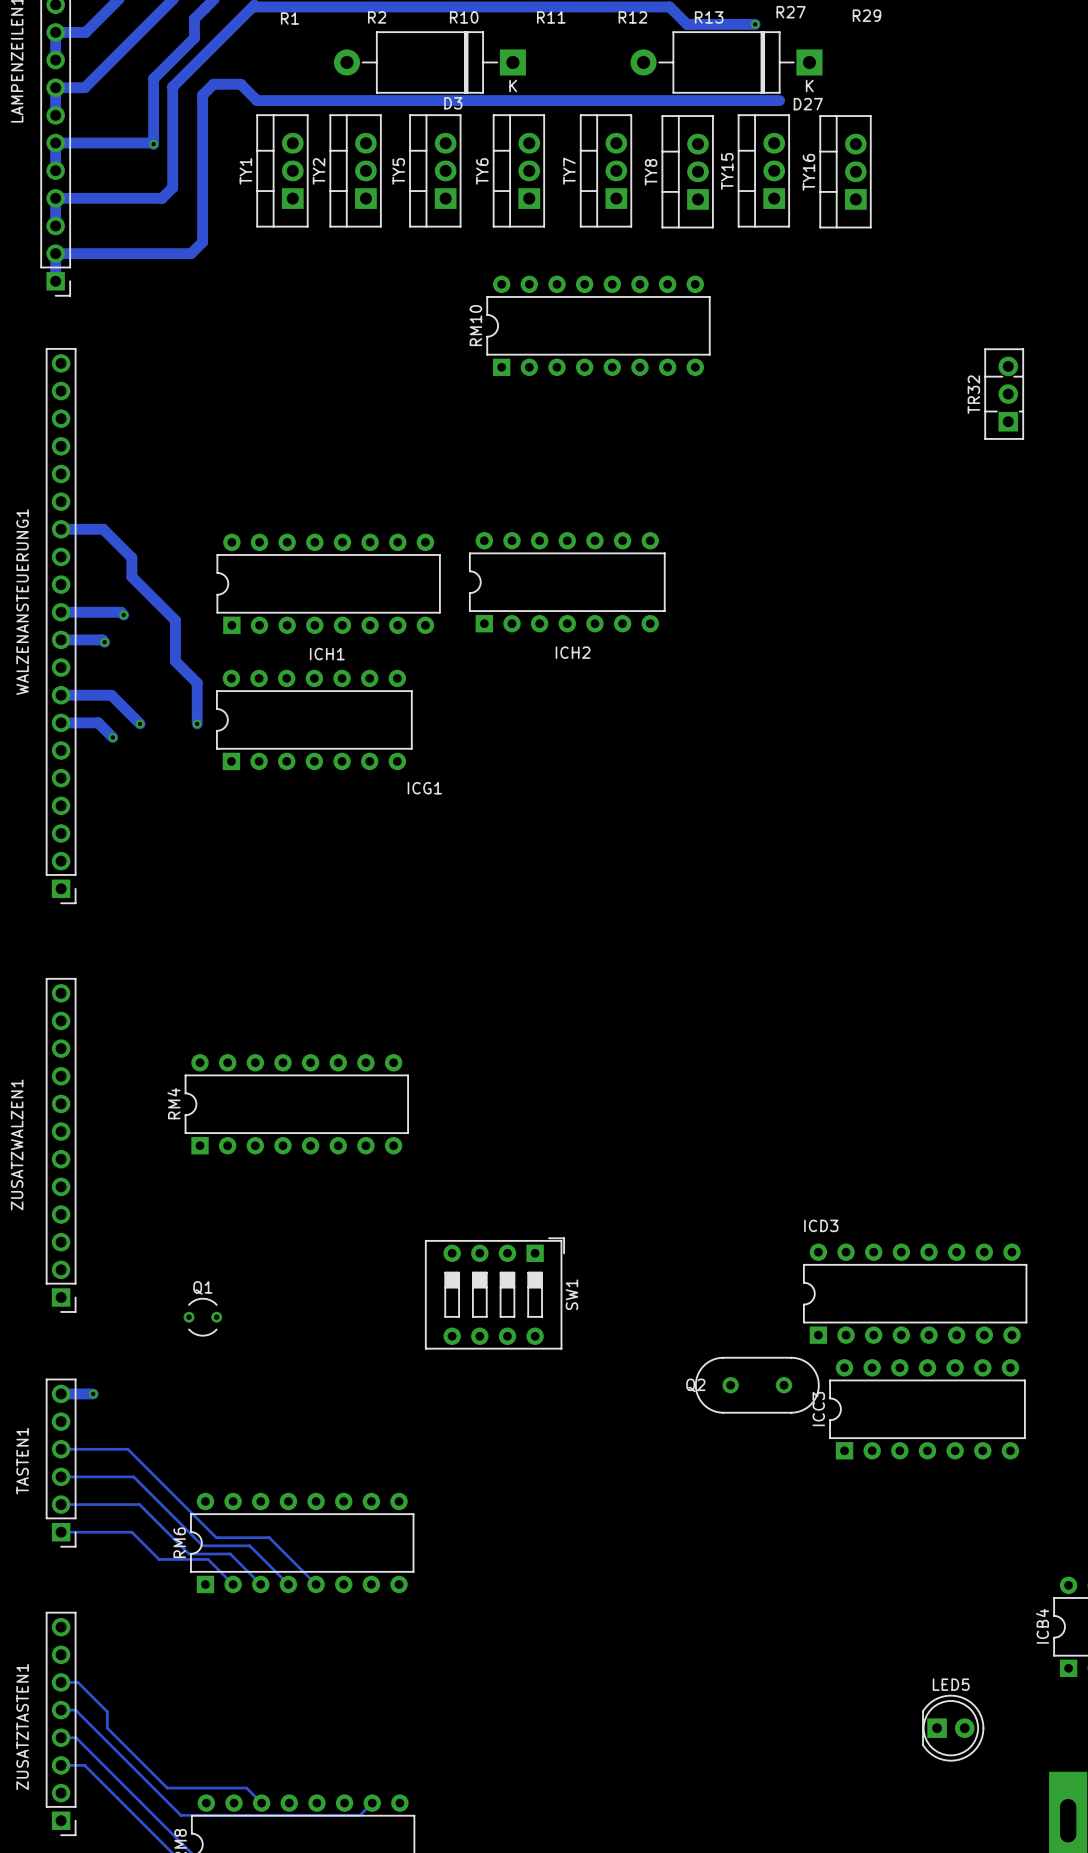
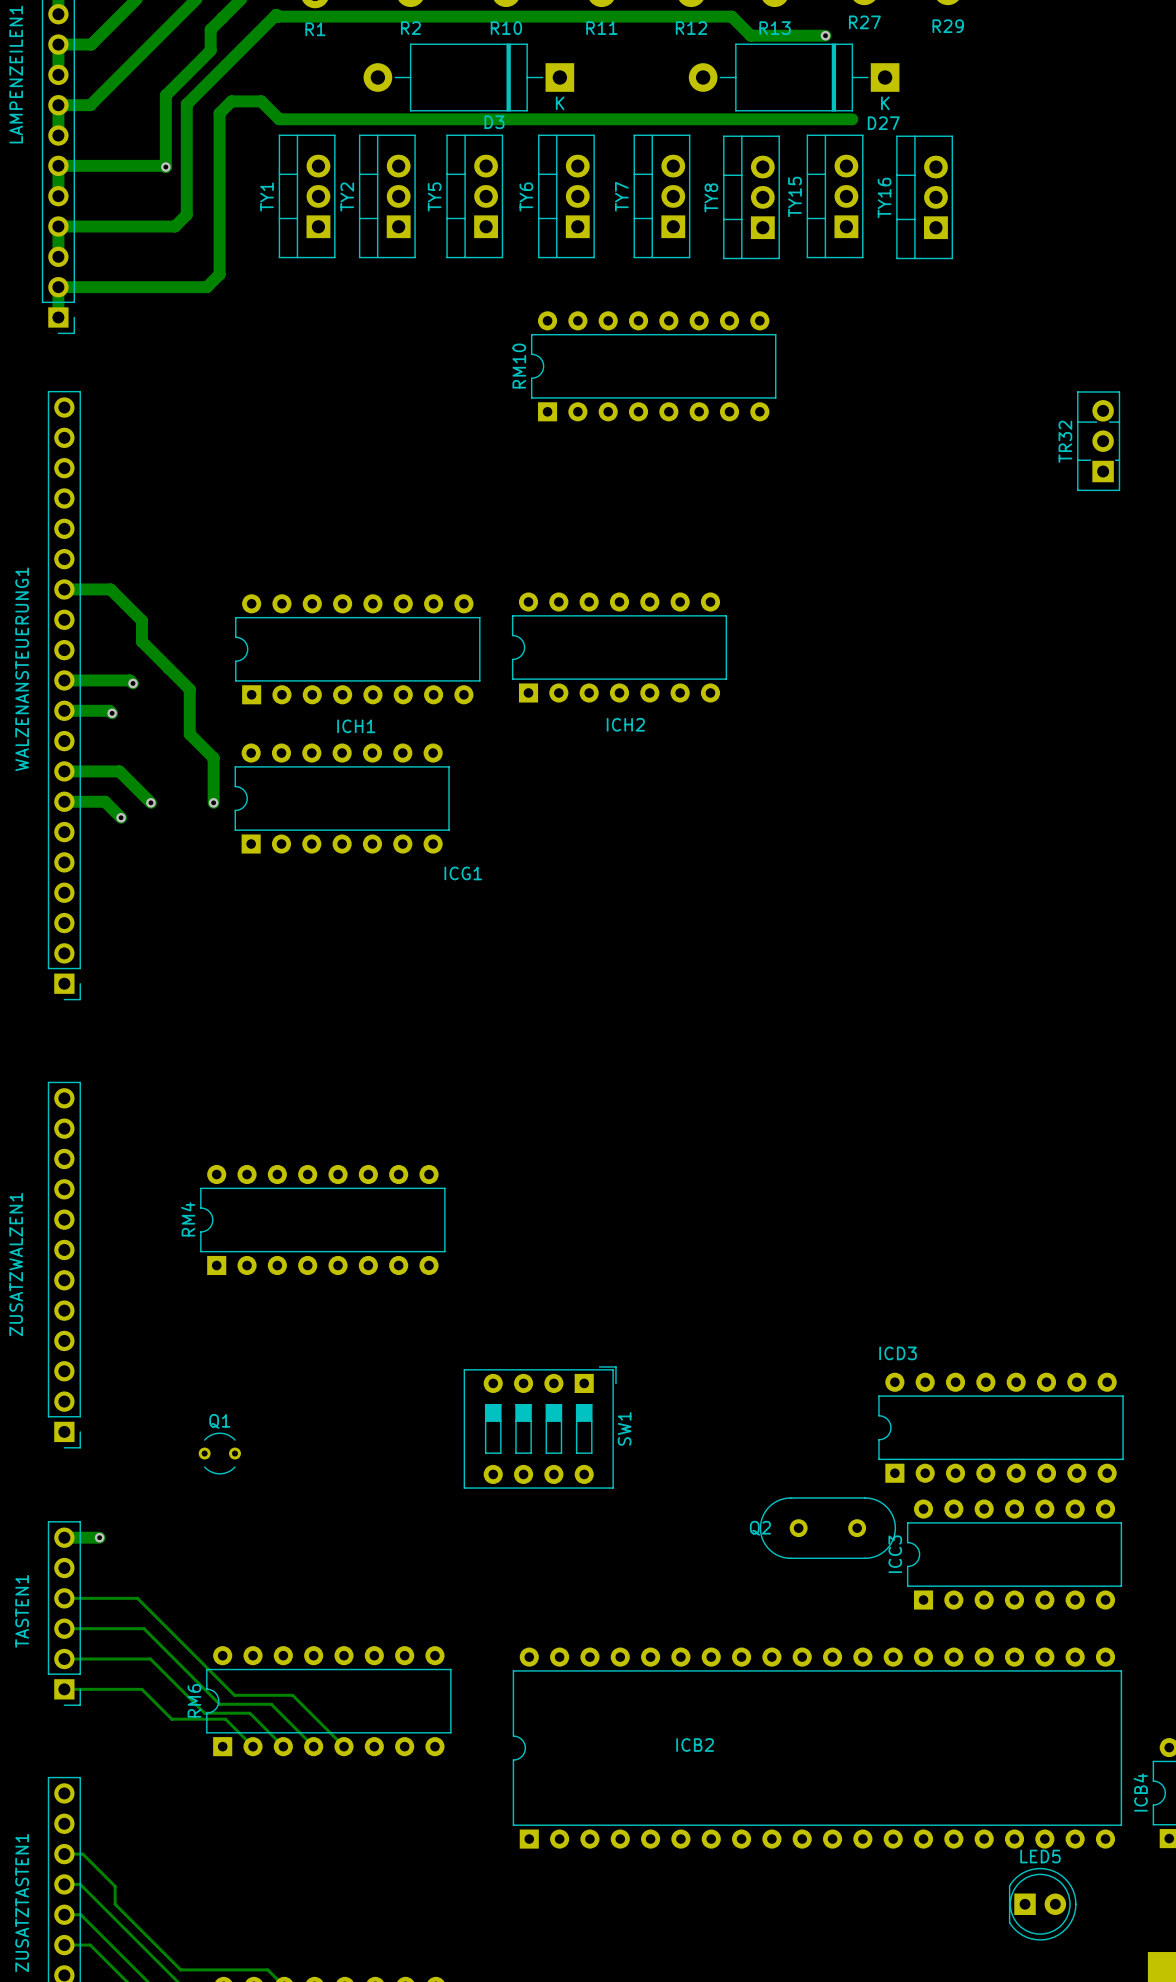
ICB2: none -> (817, 1748)

